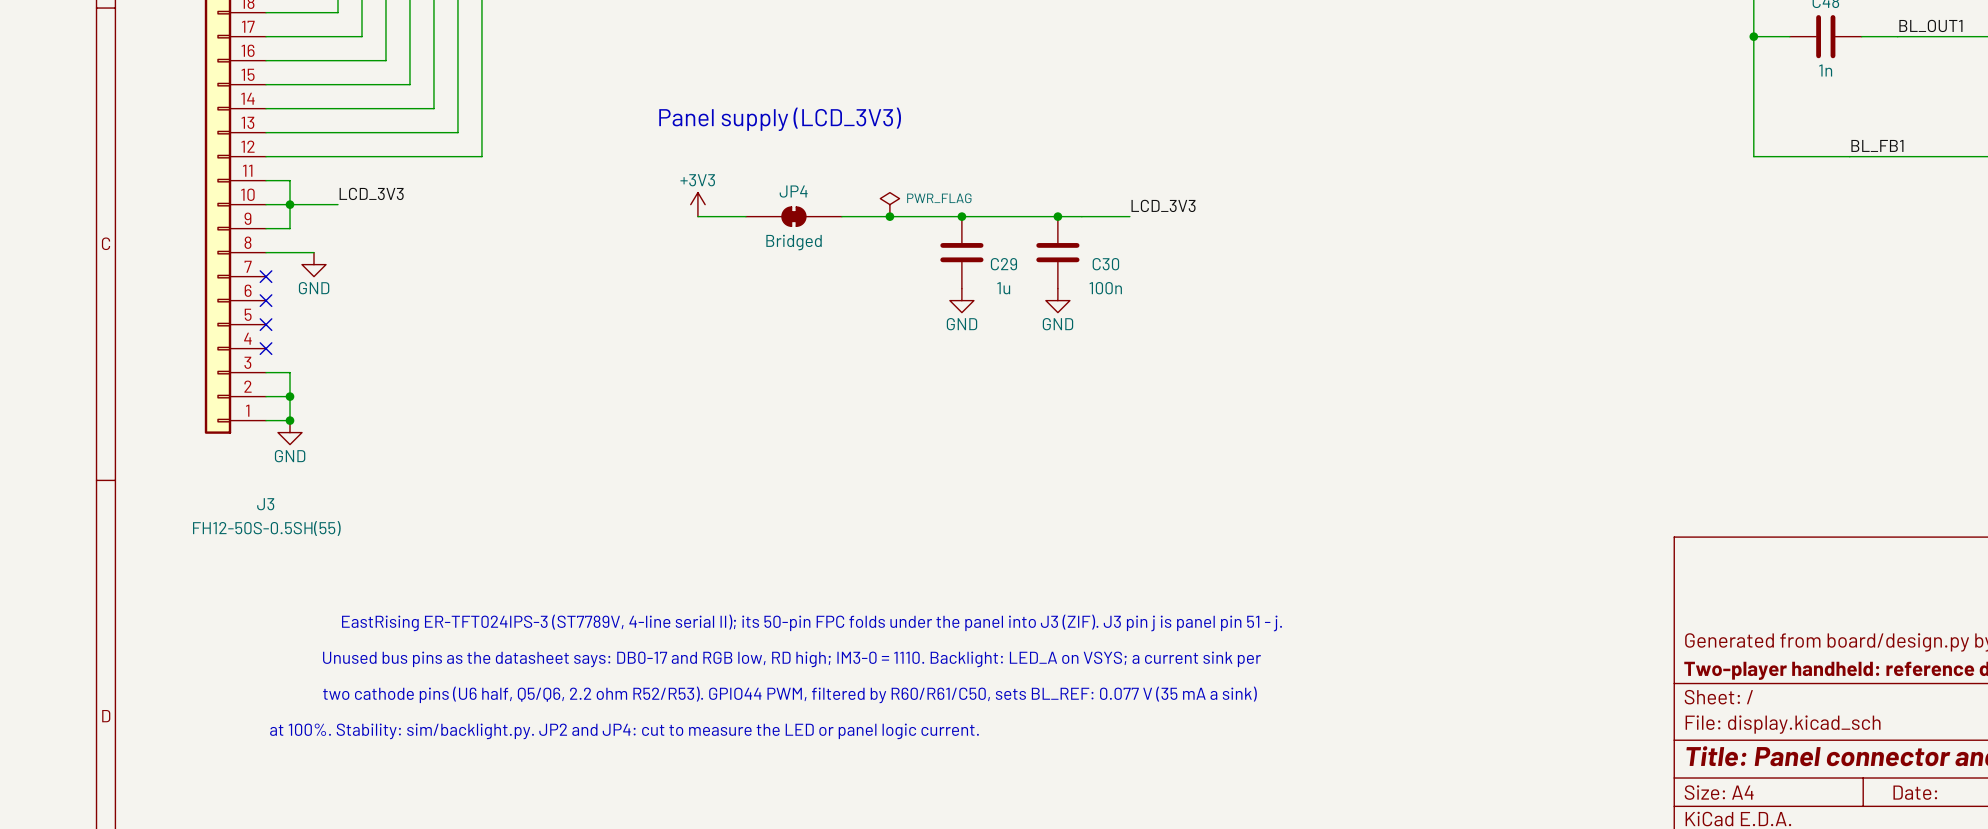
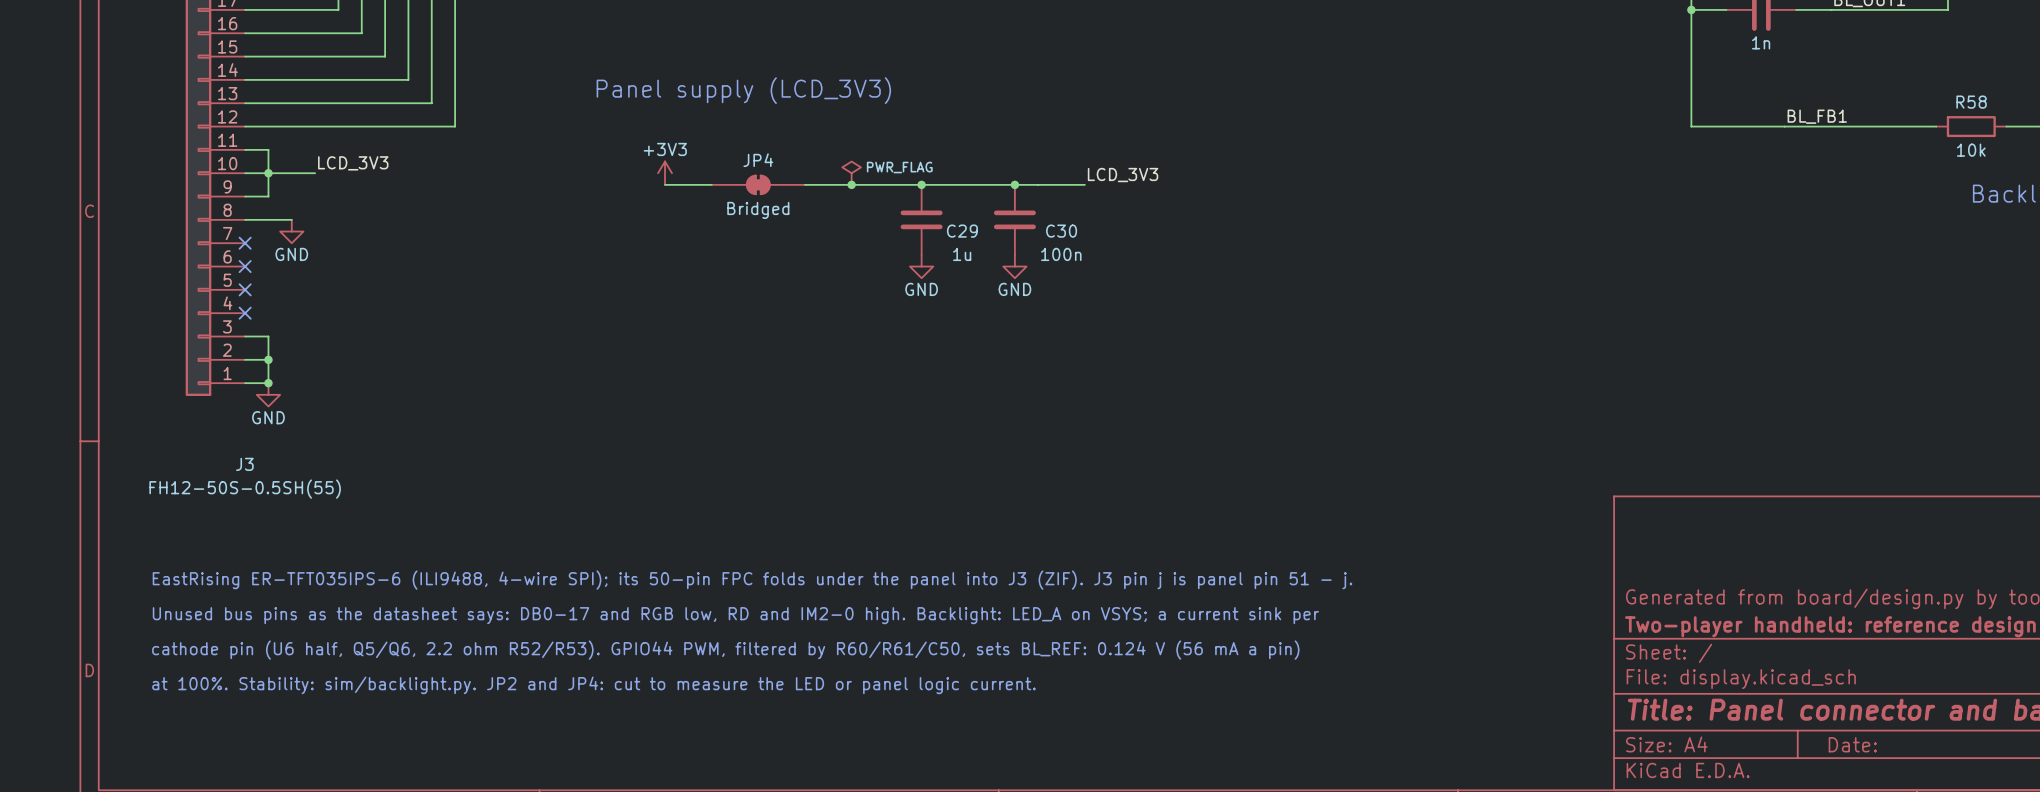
text: EastRising ER-TFT024IPS-3 (ST7789V, 4-line serial II); its 50-pin FPC folds under the panel into J3 (ZIF). J3 pin j is panel pin 51 - j. (812, 623) -> EastRising ER-TFT035IPS-6 (ILI9488, 4-wire SPI); its 50-pin FPC folds under the panel into J3 (ZIF). J3 pin j is panel pin 51 - j. (752, 580)
text: Unused bus pins as the datasheet says: DB0-17 and RGB low, RD high; IM3-0 = 1110. Backlight: LED_A on VSYS; a current sink per (792, 659) -> Unused bus pins as the datasheet says: DB0-17 and RGB low, RD and IM2-0 high. Backlight: LED_A on VSYS; a current sink per (735, 615)
text: two cathode pins (U6 half, Q5/Q6, 2.2 ohm R52/R53). GPIO44 PWM, filtered by R60/R61/C50, sets BL_REF: 0.077 V (35 mA a sink) (789, 694) -> cathode pin (U6 half, Q5/Q6, 2.2 ohm R52/R53). GPIO44 PWM, filtered by R60/R61/C50, sets BL_REF: 0.124 V (56 mA a pin) (725, 650)

